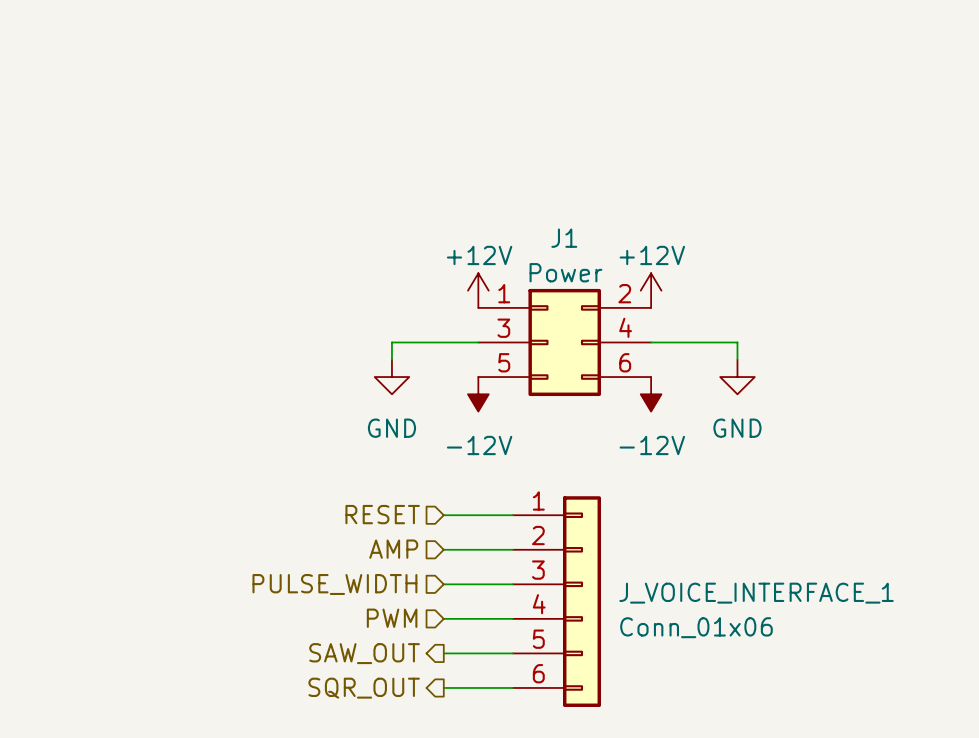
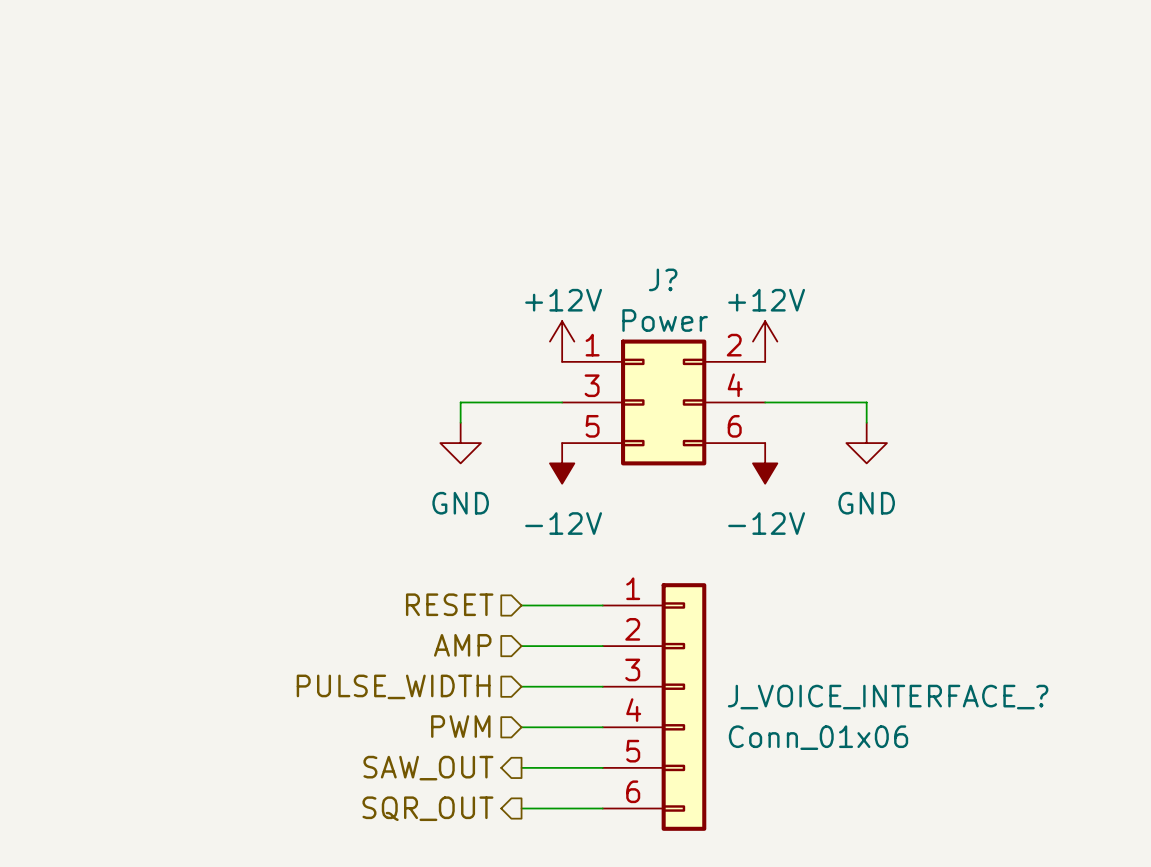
J1 name: J1 (564, 238) -> J? (663, 279)
J_VOICE_INTERFACE_1 name: J_VOICE_INTERFACE_1 (756, 593) -> J_VOICE_INTERFACE_? (888, 697)

